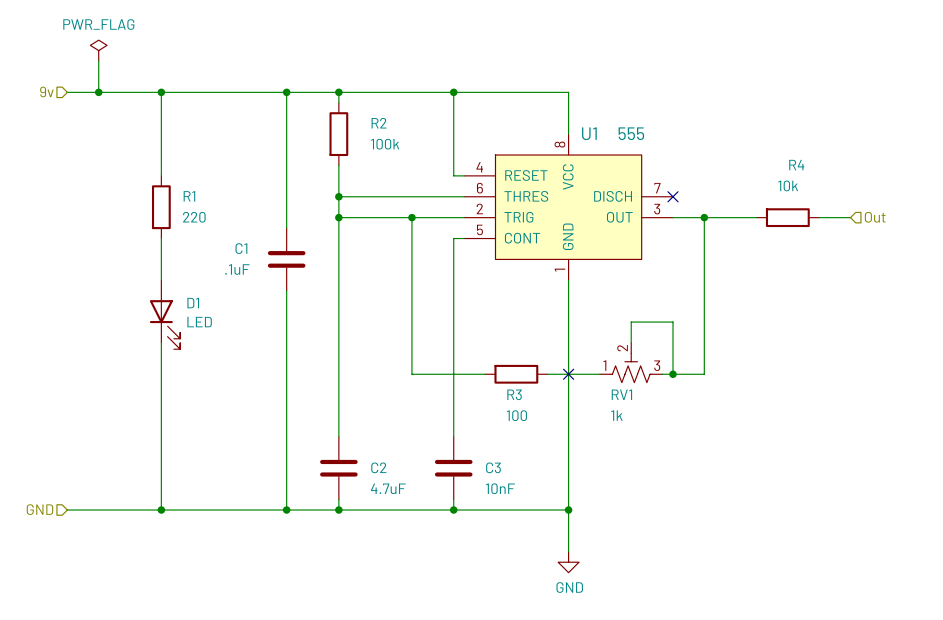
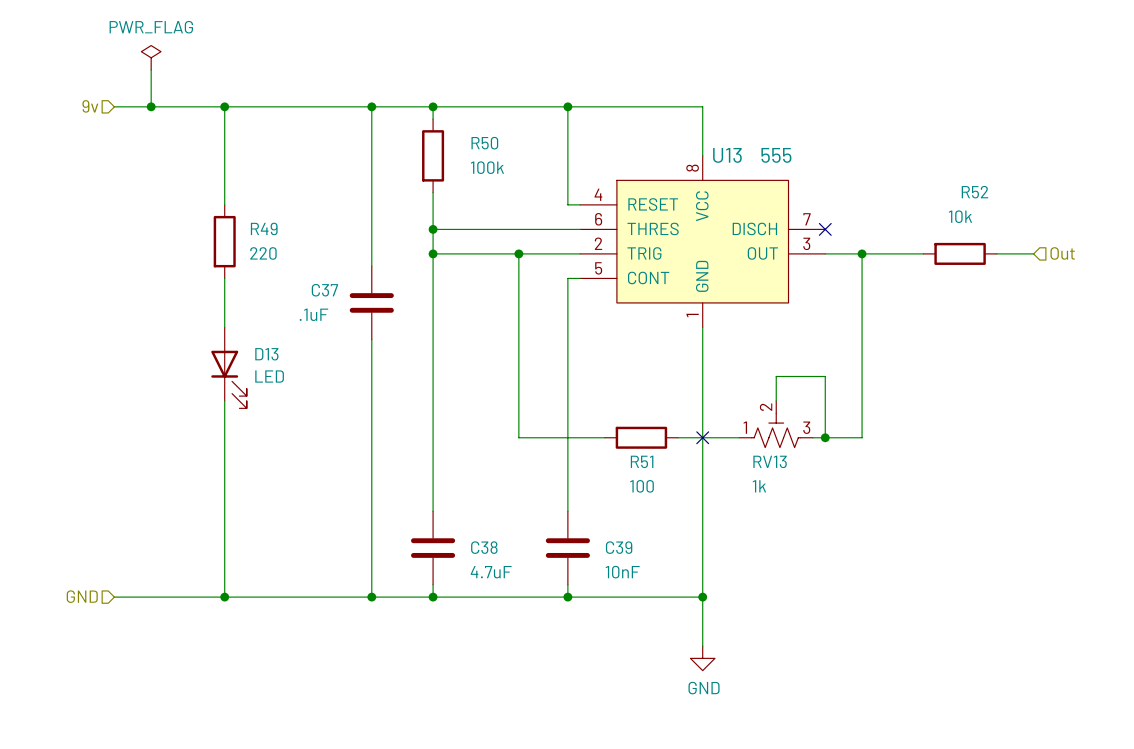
R2 name: R2 (379, 123) -> R50 (484, 143)
U1 name: U1 (589, 133) -> U13 (727, 155)
R4 name: R4 (796, 165) -> R52 (974, 192)
R1 name: R1 (189, 196) -> R49 (264, 228)
C1 name: C1 (241, 248) -> C37 (324, 290)
D1 name: D1 (193, 303) -> D13 (266, 354)
R3 name: R3 (514, 394) -> R51 (642, 461)
RV1 name: RV1 (621, 394) -> RV13 (770, 461)
C2 name: C2 (378, 467) -> C38 (484, 547)
C3 name: C3 (493, 467) -> C39 (619, 547)

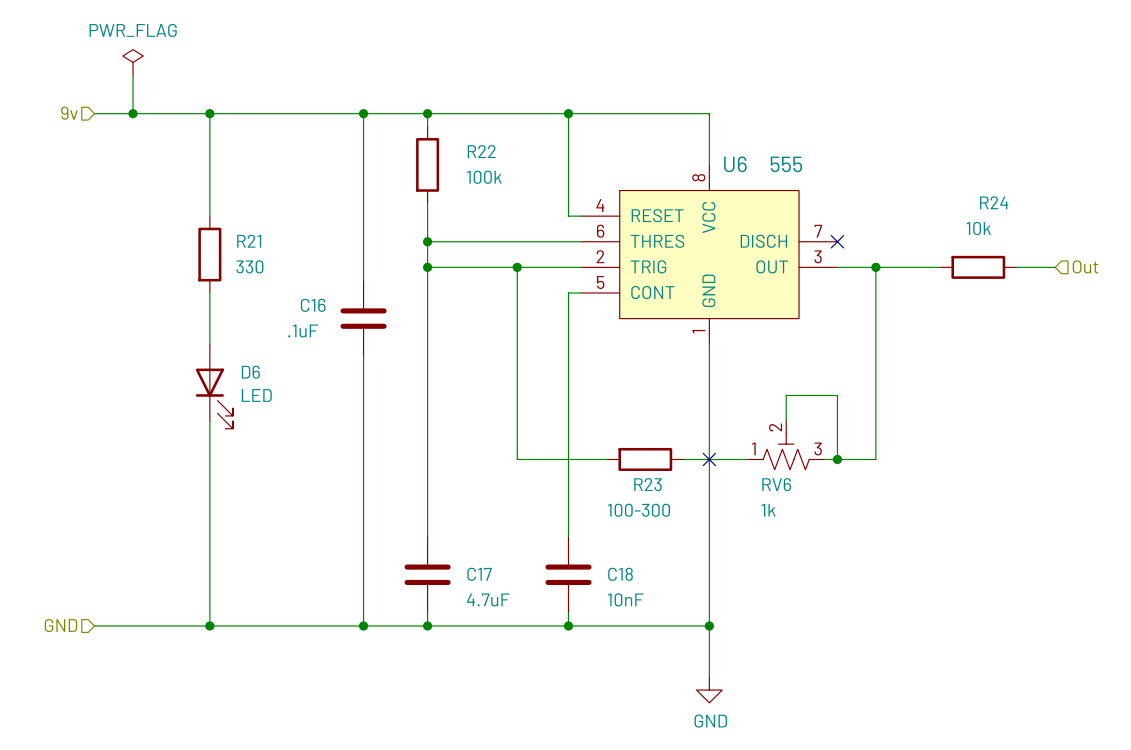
R50 name: R50 (484, 143) -> R22 (481, 151)
U13 name: U13 (727, 155) -> U6 (735, 164)
R52 name: R52 (974, 192) -> R24 (994, 202)
R49 name: R49 (264, 228) -> R21 (249, 241)
R49 value: 220 (263, 253) -> 330 (249, 266)
C37 name: C37 (324, 290) -> C16 (313, 305)
D13 name: D13 (266, 354) -> D6 (250, 372)
R51 name: R51 (642, 461) -> R23 (648, 484)
RV13 name: RV13 (770, 461) -> RV6 (776, 484)
R51 value: 100 (642, 486) -> 100-300 (638, 510)
C38 name: C38 (484, 547) -> C17 (479, 574)
C39 name: C39 (619, 547) -> C18 (620, 574)

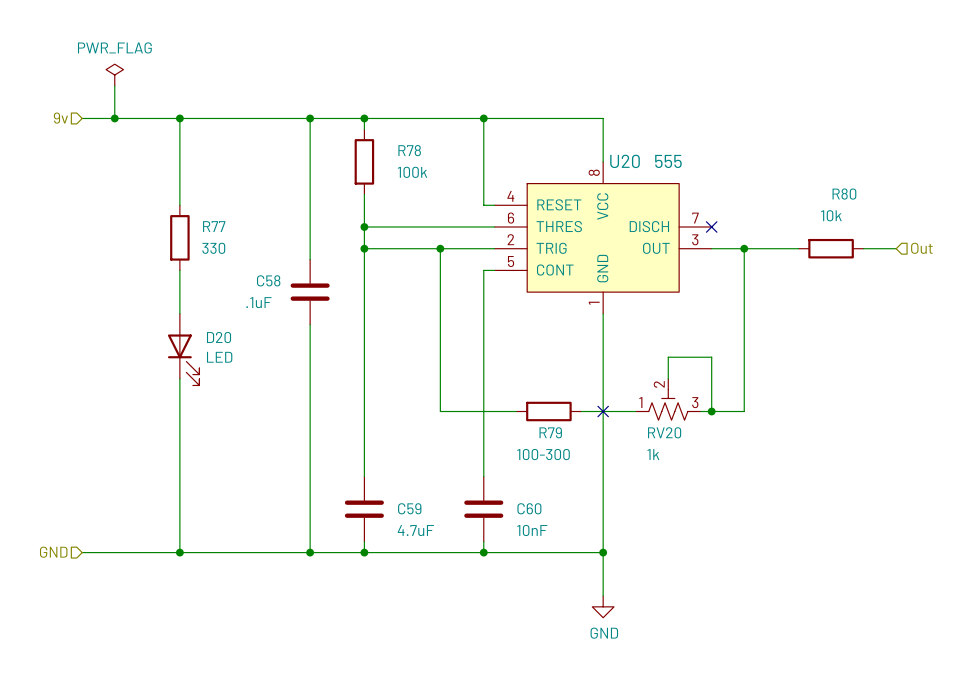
R22 name: R22 (481, 151) -> R78 (409, 150)
U6 name: U6 (735, 164) -> U20 (625, 161)
R24 name: R24 (994, 202) -> R80 (844, 194)
R21 name: R21 (249, 241) -> R77 (214, 226)
C16 name: C16 (313, 305) -> C58 (268, 280)
D6 name: D6 (250, 372) -> D20 (219, 337)
R23 name: R23 (648, 484) -> R79 (550, 432)
RV6 name: RV6 (776, 484) -> RV20 (664, 432)
C17 name: C17 (479, 574) -> C59 (409, 508)
C18 name: C18 (620, 574) -> C60 (529, 508)

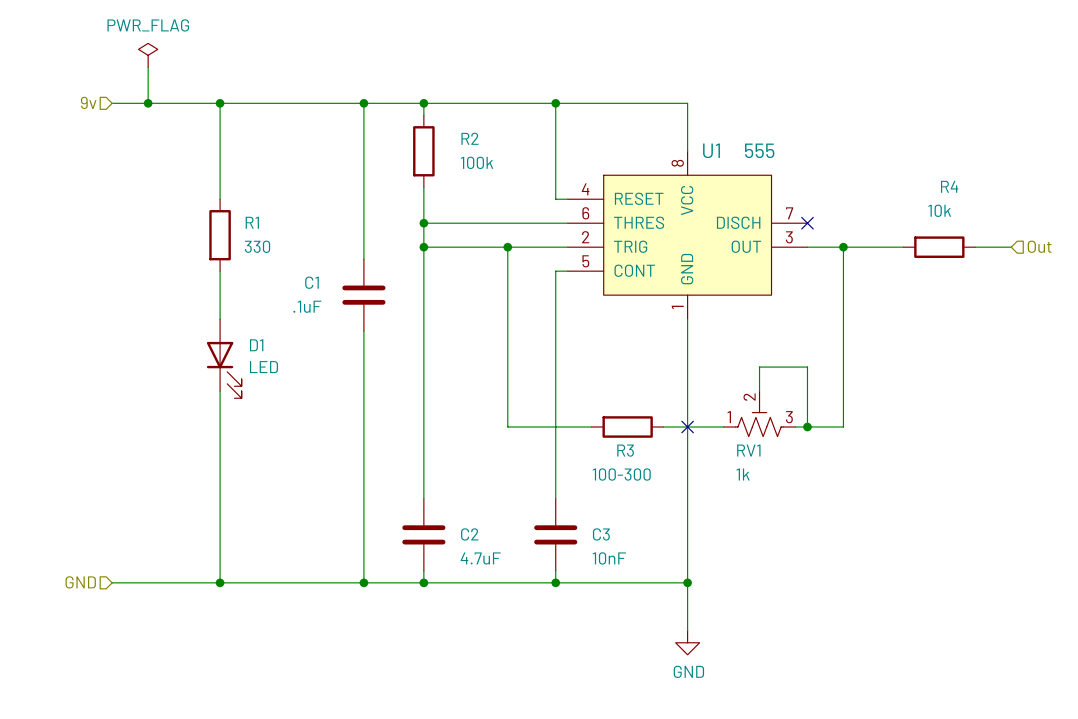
R78 name: R78 (409, 150) -> R2 (469, 138)
U20 name: U20 (625, 161) -> U1 (711, 150)
R80 name: R80 (844, 194) -> R4 (949, 186)
R77 name: R77 (214, 226) -> R1 (252, 222)
C58 name: C58 (268, 280) -> C1 (312, 282)
D20 name: D20 (219, 337) -> D1 (256, 345)
R79 name: R79 (550, 432) -> R3 (625, 450)
RV20 name: RV20 (664, 432) -> RV1 (748, 450)
C59 name: C59 (409, 508) -> C2 (469, 534)
C60 name: C60 (529, 508) -> C3 (601, 534)

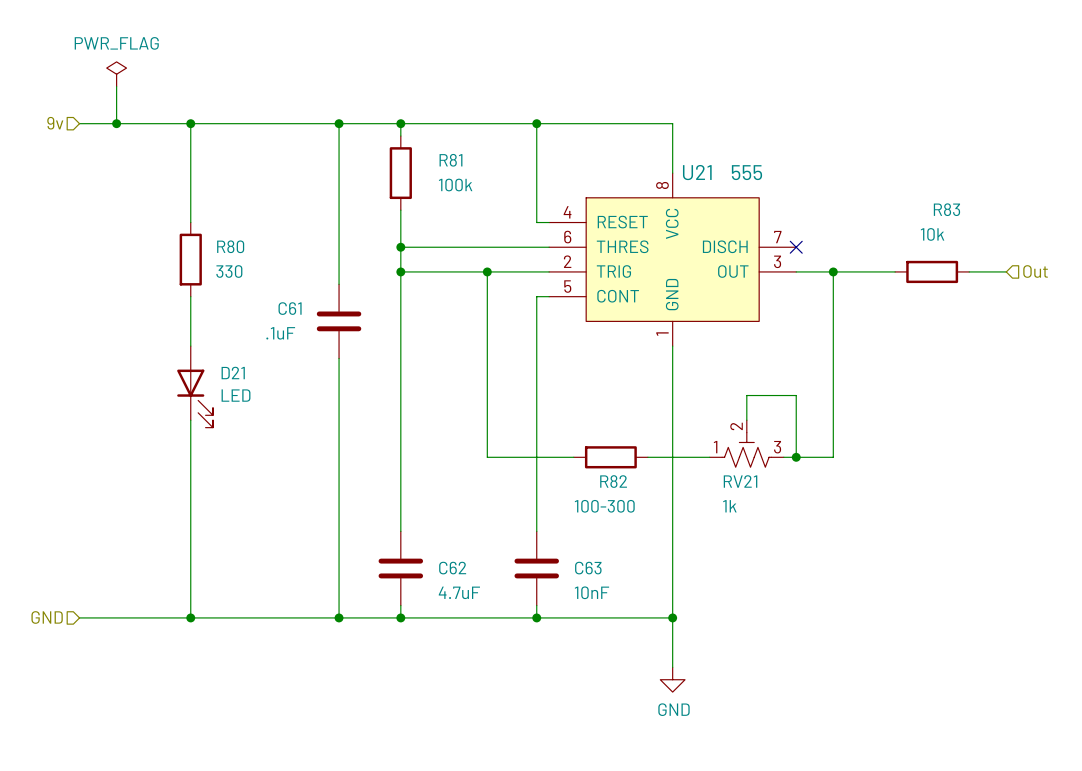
R2 name: R2 (469, 138) -> R81 (450, 160)
U1 name: U1 (711, 150) -> U21 (697, 172)
R4 name: R4 (949, 186) -> R83 (946, 209)
R1 name: R1 (252, 222) -> R80 (230, 246)
C1 name: C1 (312, 282) -> C61 (290, 308)
D1 name: D1 (256, 345) -> D21 (233, 372)
no-connect mark: (687, 427) -> none
R3 name: R3 (625, 450) -> R82 (613, 481)
RV1 name: RV1 (748, 450) -> RV21 (740, 481)
C2 name: C2 (469, 534) -> C62 (452, 568)
C3 name: C3 (601, 534) -> C63 (588, 568)

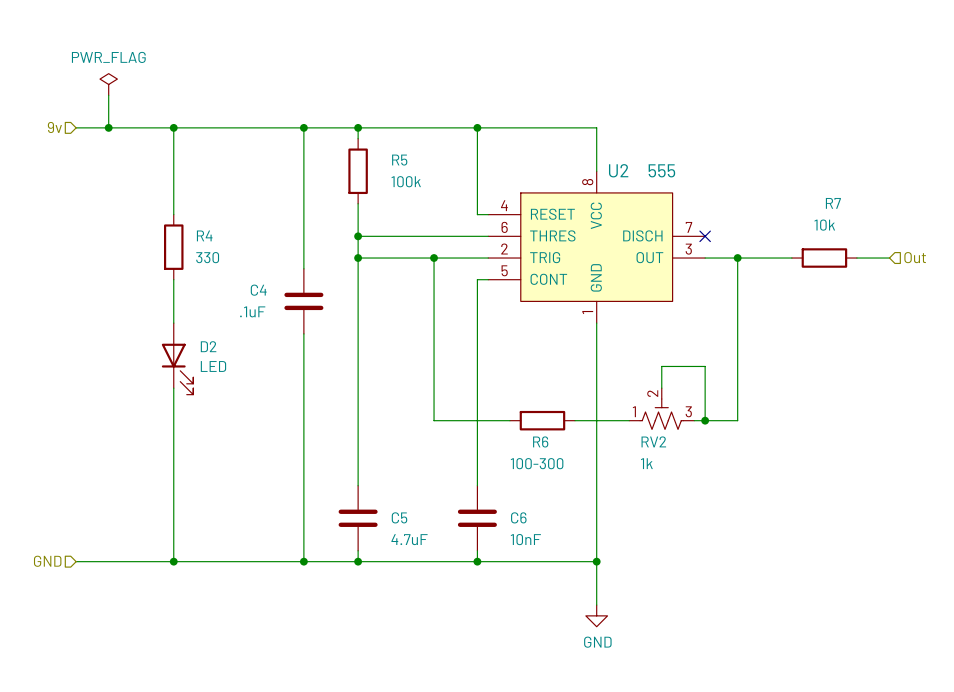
R81 name: R81 (450, 160) -> R5 (399, 160)
U21 name: U21 (697, 172) -> U2 (618, 170)
R83 name: R83 (946, 209) -> R7 (833, 203)
R80 name: R80 (230, 246) -> R4 (204, 235)
C61 name: C61 (290, 308) -> C4 (258, 290)
D21 name: D21 (233, 372) -> D2 (208, 346)
R82 name: R82 (613, 481) -> R6 (540, 441)
RV21 name: RV21 (740, 481) -> RV2 (653, 441)
C62 name: C62 (452, 568) -> C5 (399, 517)
C63 name: C63 (588, 568) -> C6 (518, 517)

